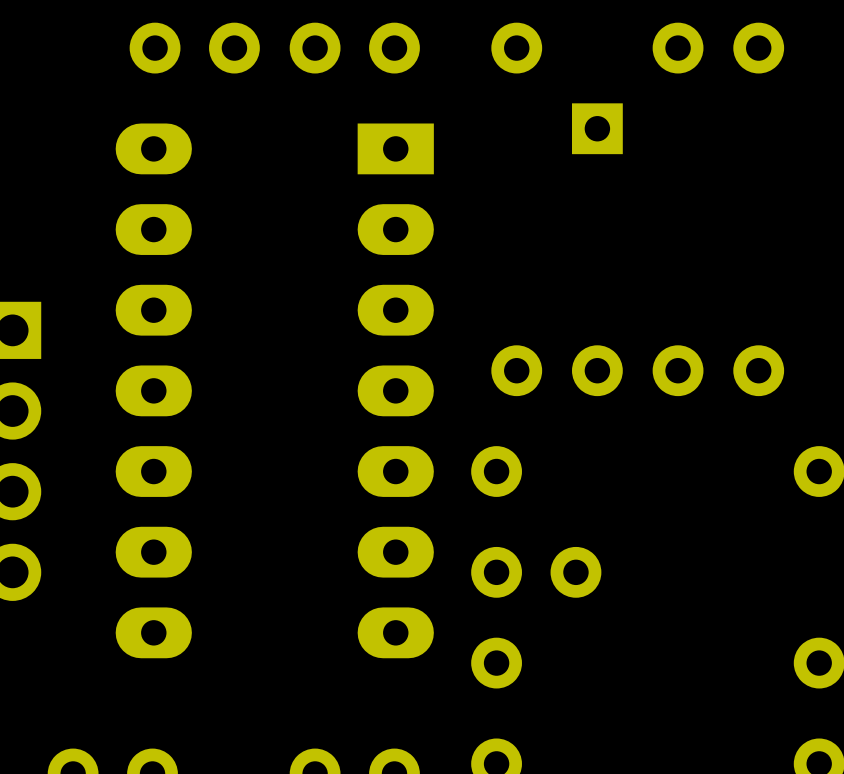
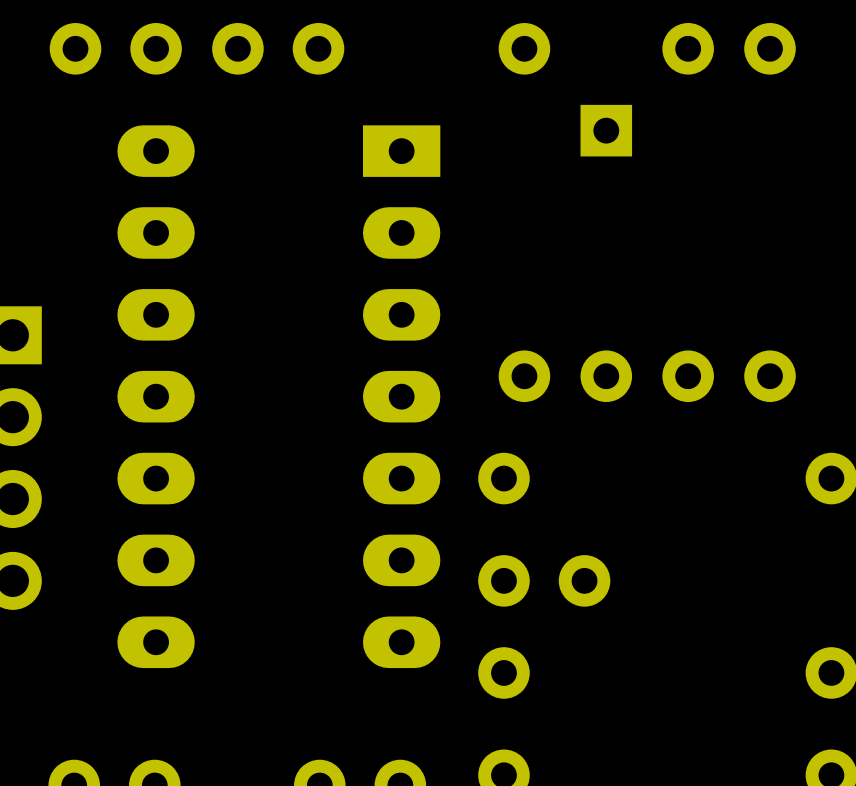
part: none -> (115, 48)
part: (194, 48) -> none
part: none -> (278, 48)
part: (354, 48) -> none

